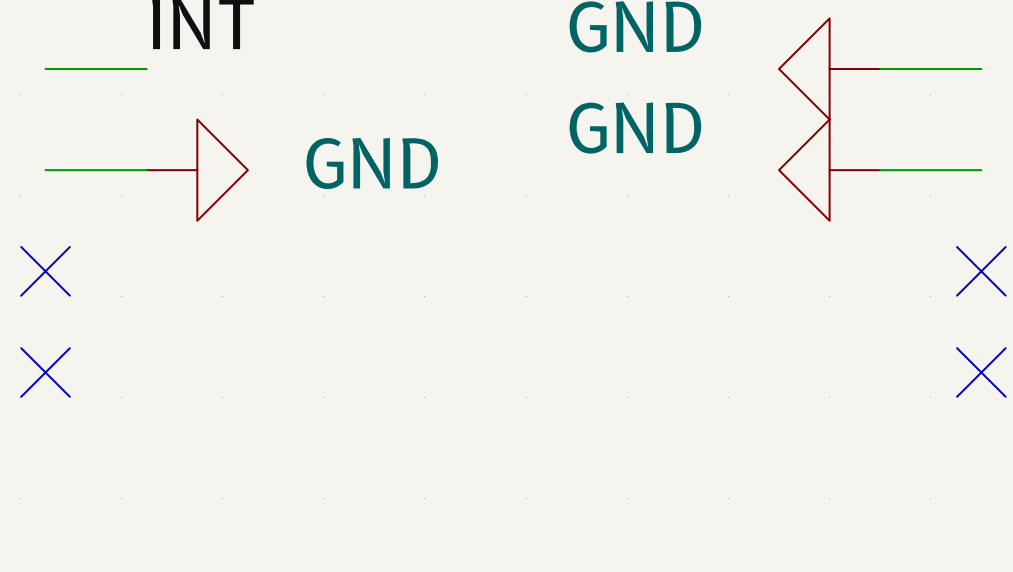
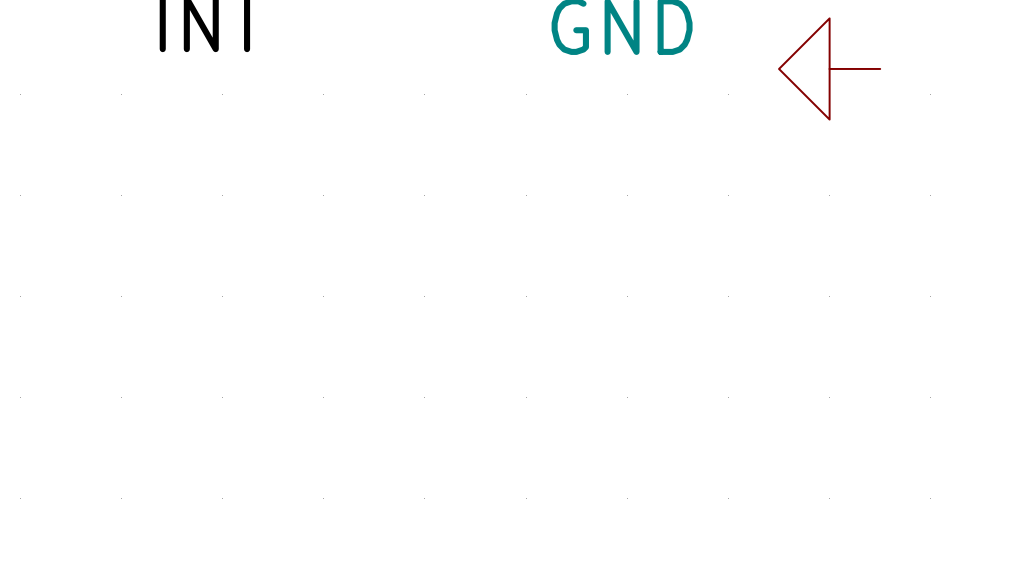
wire: (45, 68) (146, 68) -> none
wire: (880, 68) (981, 68) -> none
wire: (45, 170) (146, 170) -> none
power symbol: GND (197, 170) -> none
power symbol: GND (829, 170) -> none
wire: (880, 170) (981, 170) -> none
no-connect mark: (45, 271) -> none
no-connect mark: (981, 271) -> none
no-connect mark: (45, 372) -> none
no-connect mark: (981, 372) -> none

